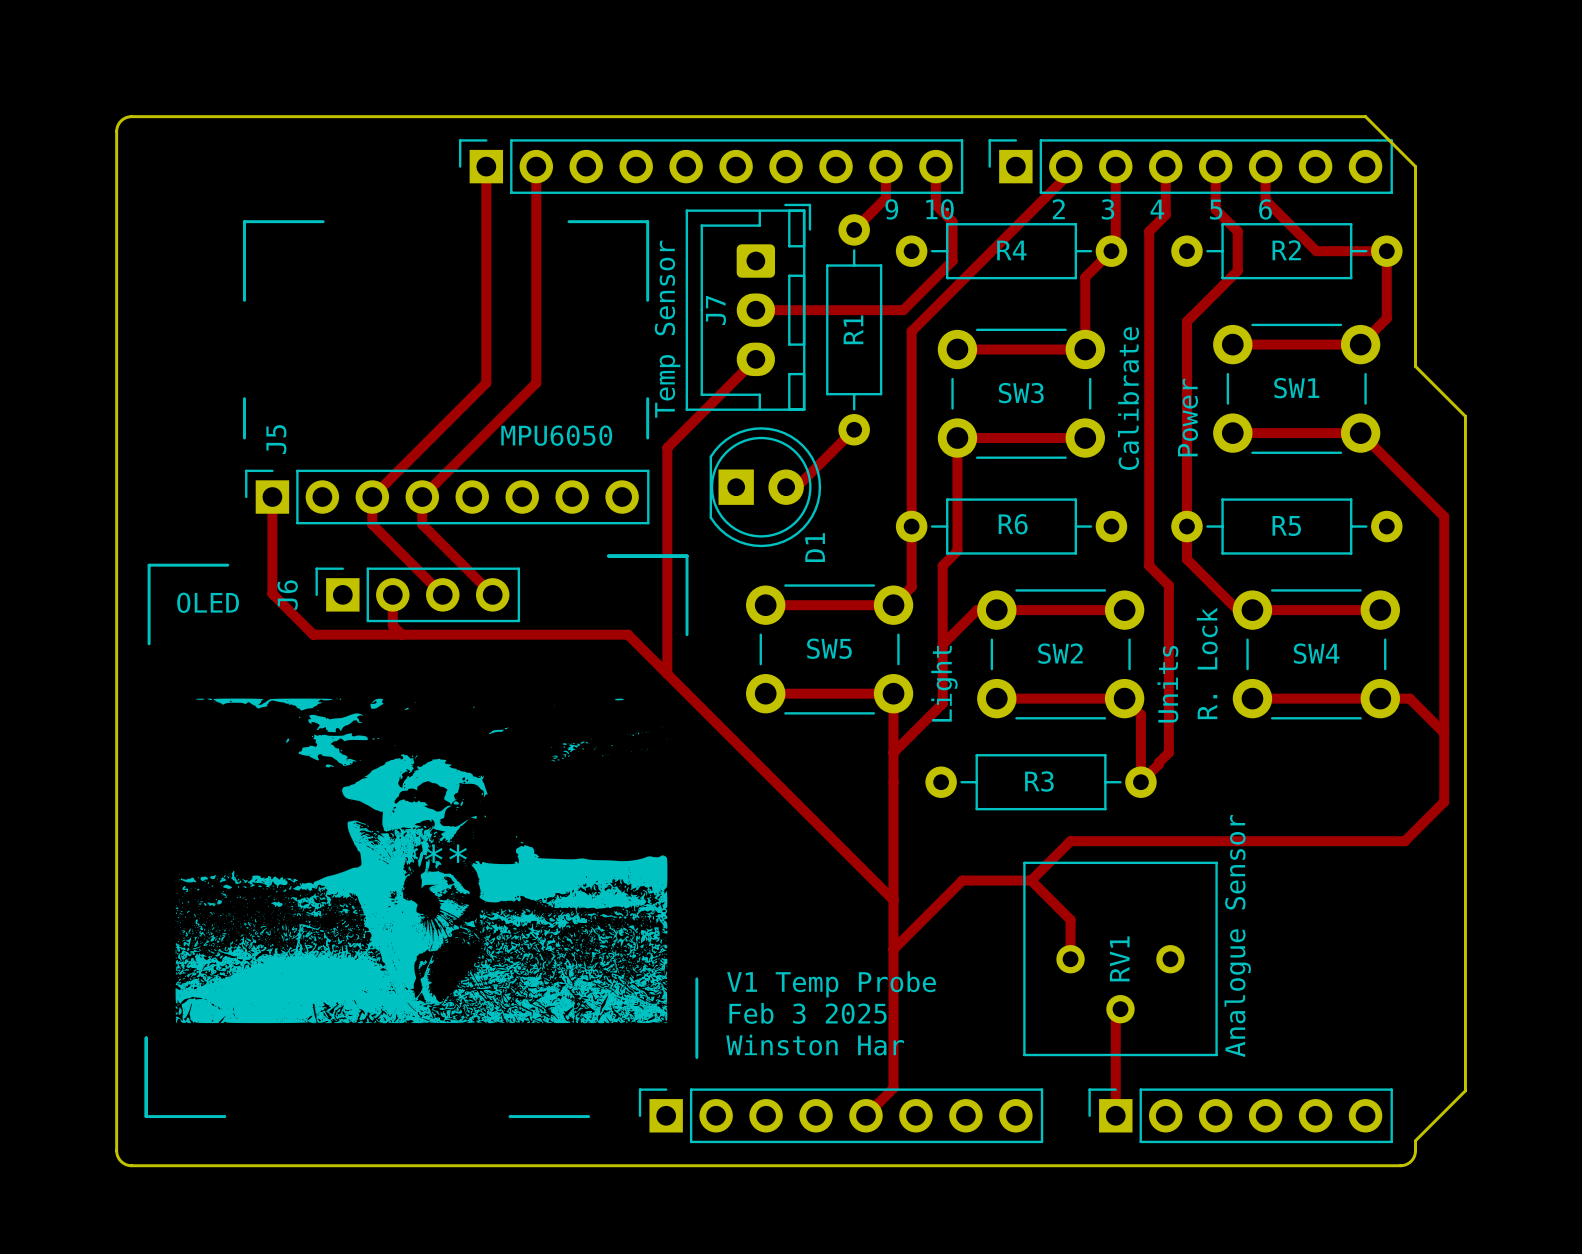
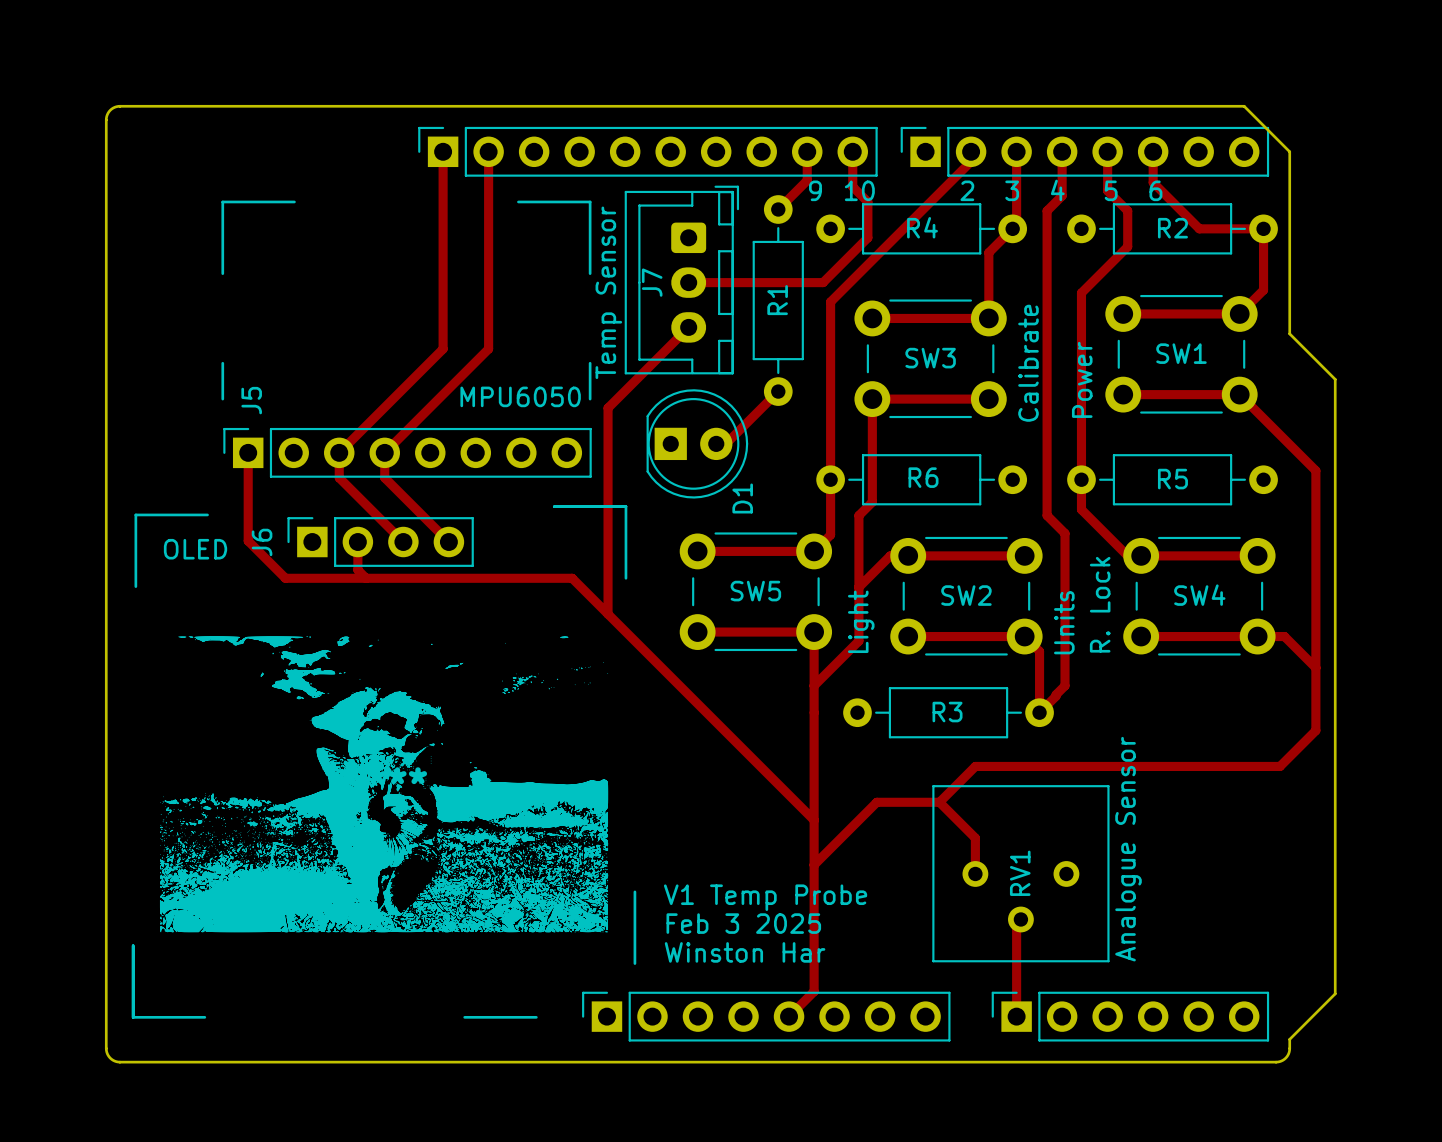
drawing: none -> [159, 636, 609, 933]

